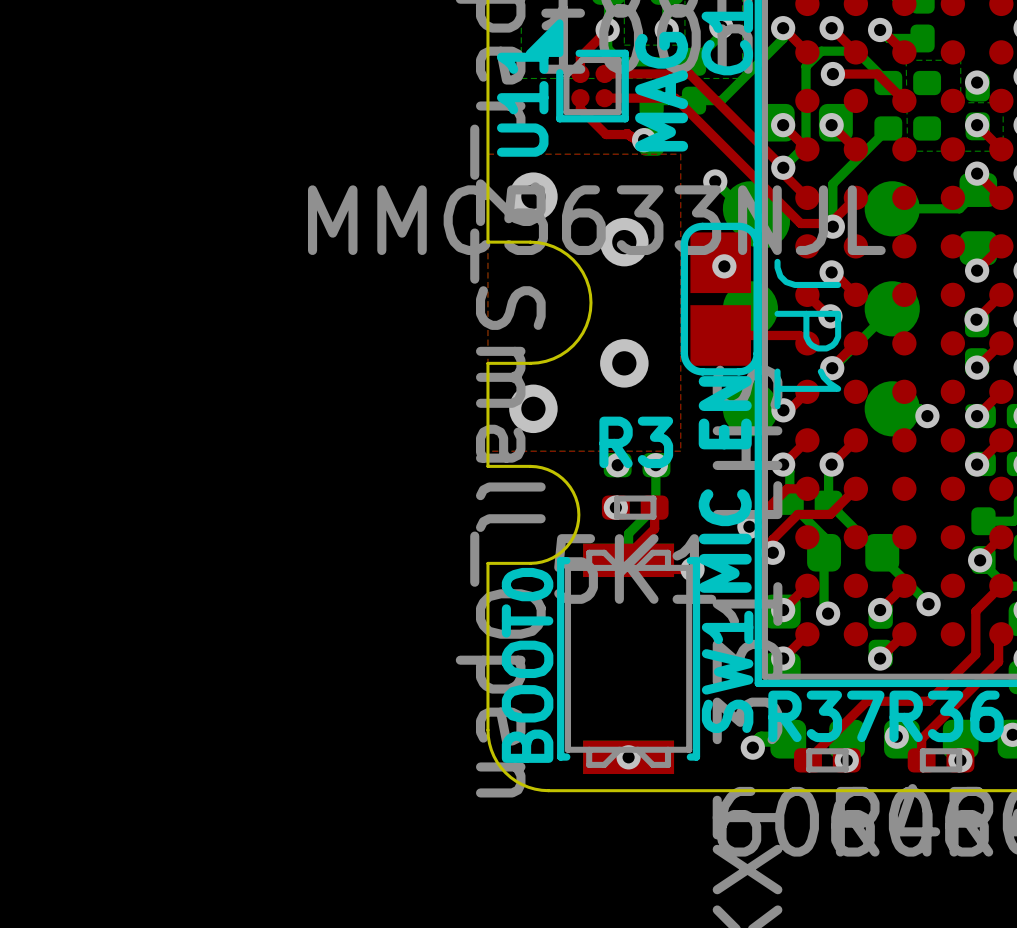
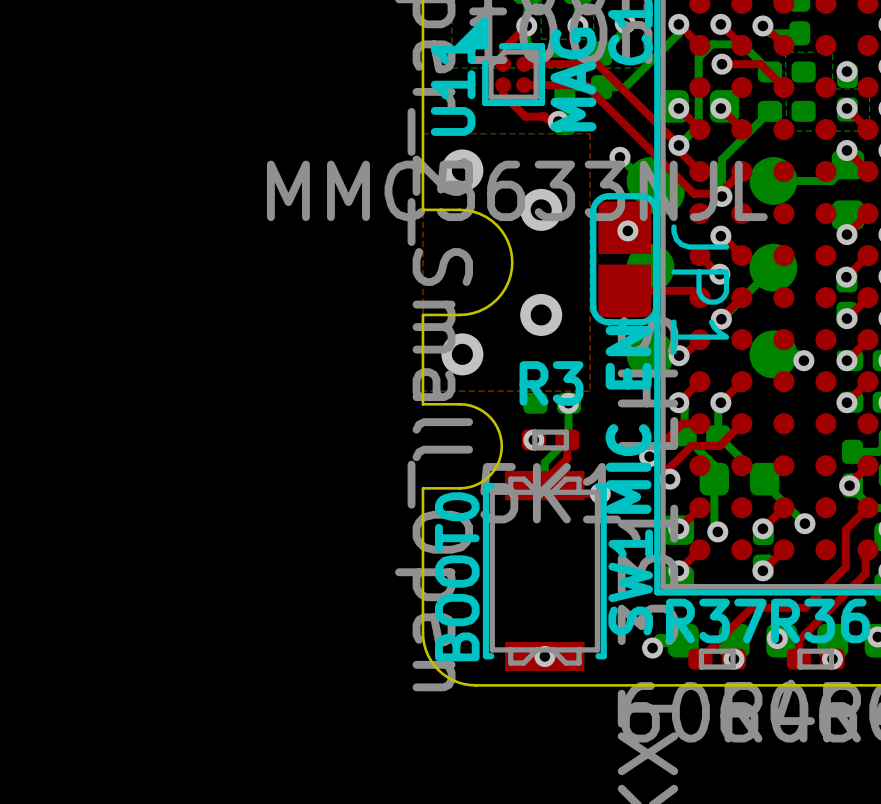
via: (617, 465) -> none

